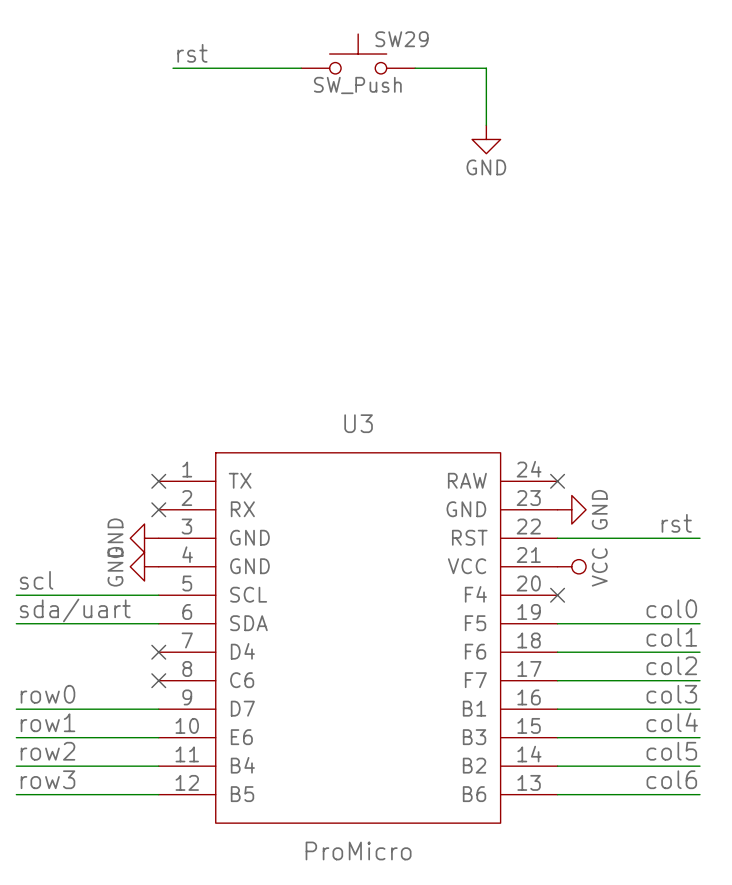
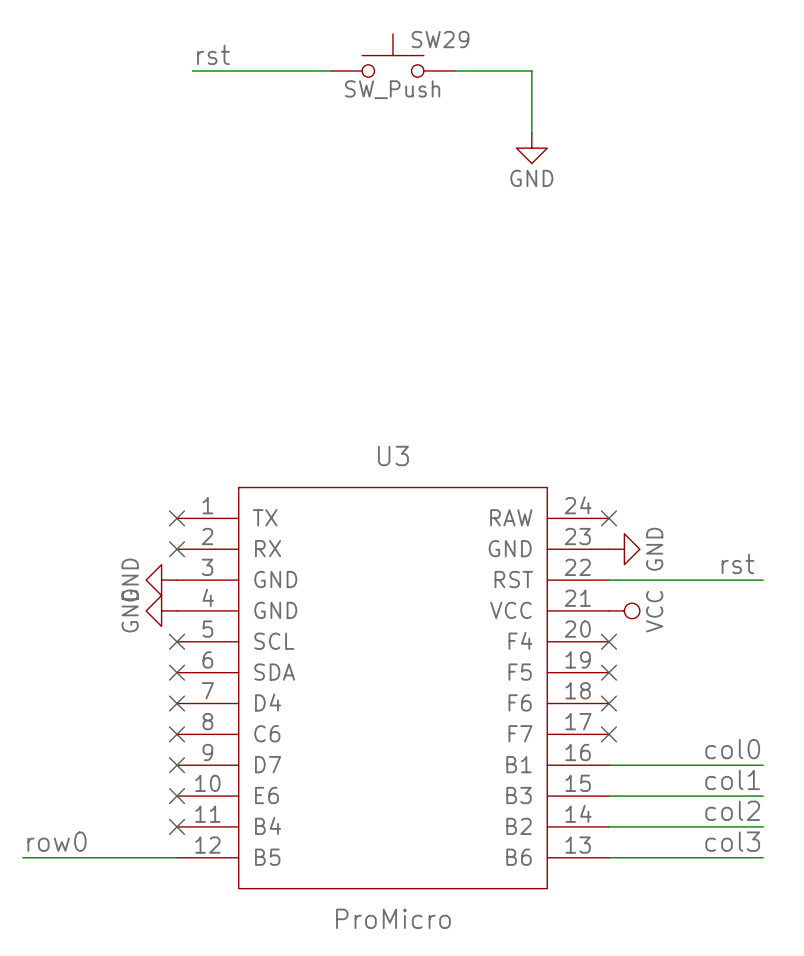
label: scl (36, 580) -> none
wire: (16, 595) (158, 595) -> none
no-connect mark: none -> (177, 641)
label: col0 (671, 608) -> none
label: sda/uart (75, 610) -> none
wire: (16, 623) (158, 623) -> none
no-connect mark: none -> (177, 672)
wire: (557, 623) (700, 623) -> none
no-connect mark: none -> (608, 672)
label: col1 (671, 637) -> none
wire: (557, 652) (700, 652) -> none
no-connect mark: none -> (608, 703)
label: col2 (671, 665) -> none
wire: (557, 680) (700, 680) -> none
no-connect mark: none -> (608, 734)
label: row0 (47, 694) -> none
label: col3 (671, 694) -> col0 (732, 749)
wire: (16, 709) (158, 709) -> none
no-connect mark: none -> (177, 765)
label: row1 (47, 722) -> none
label: col4 (672, 722) -> col1 (732, 779)
wire: (16, 737) (158, 737) -> none
no-connect mark: none -> (177, 796)
label: row2 (47, 751) -> none
label: col5 (671, 751) -> col2 (732, 810)
wire: (16, 766) (158, 766) -> none
no-connect mark: none -> (177, 826)
label: row3 (47, 779) -> row0 (57, 841)
label: col6 (671, 779) -> col3 (732, 841)

